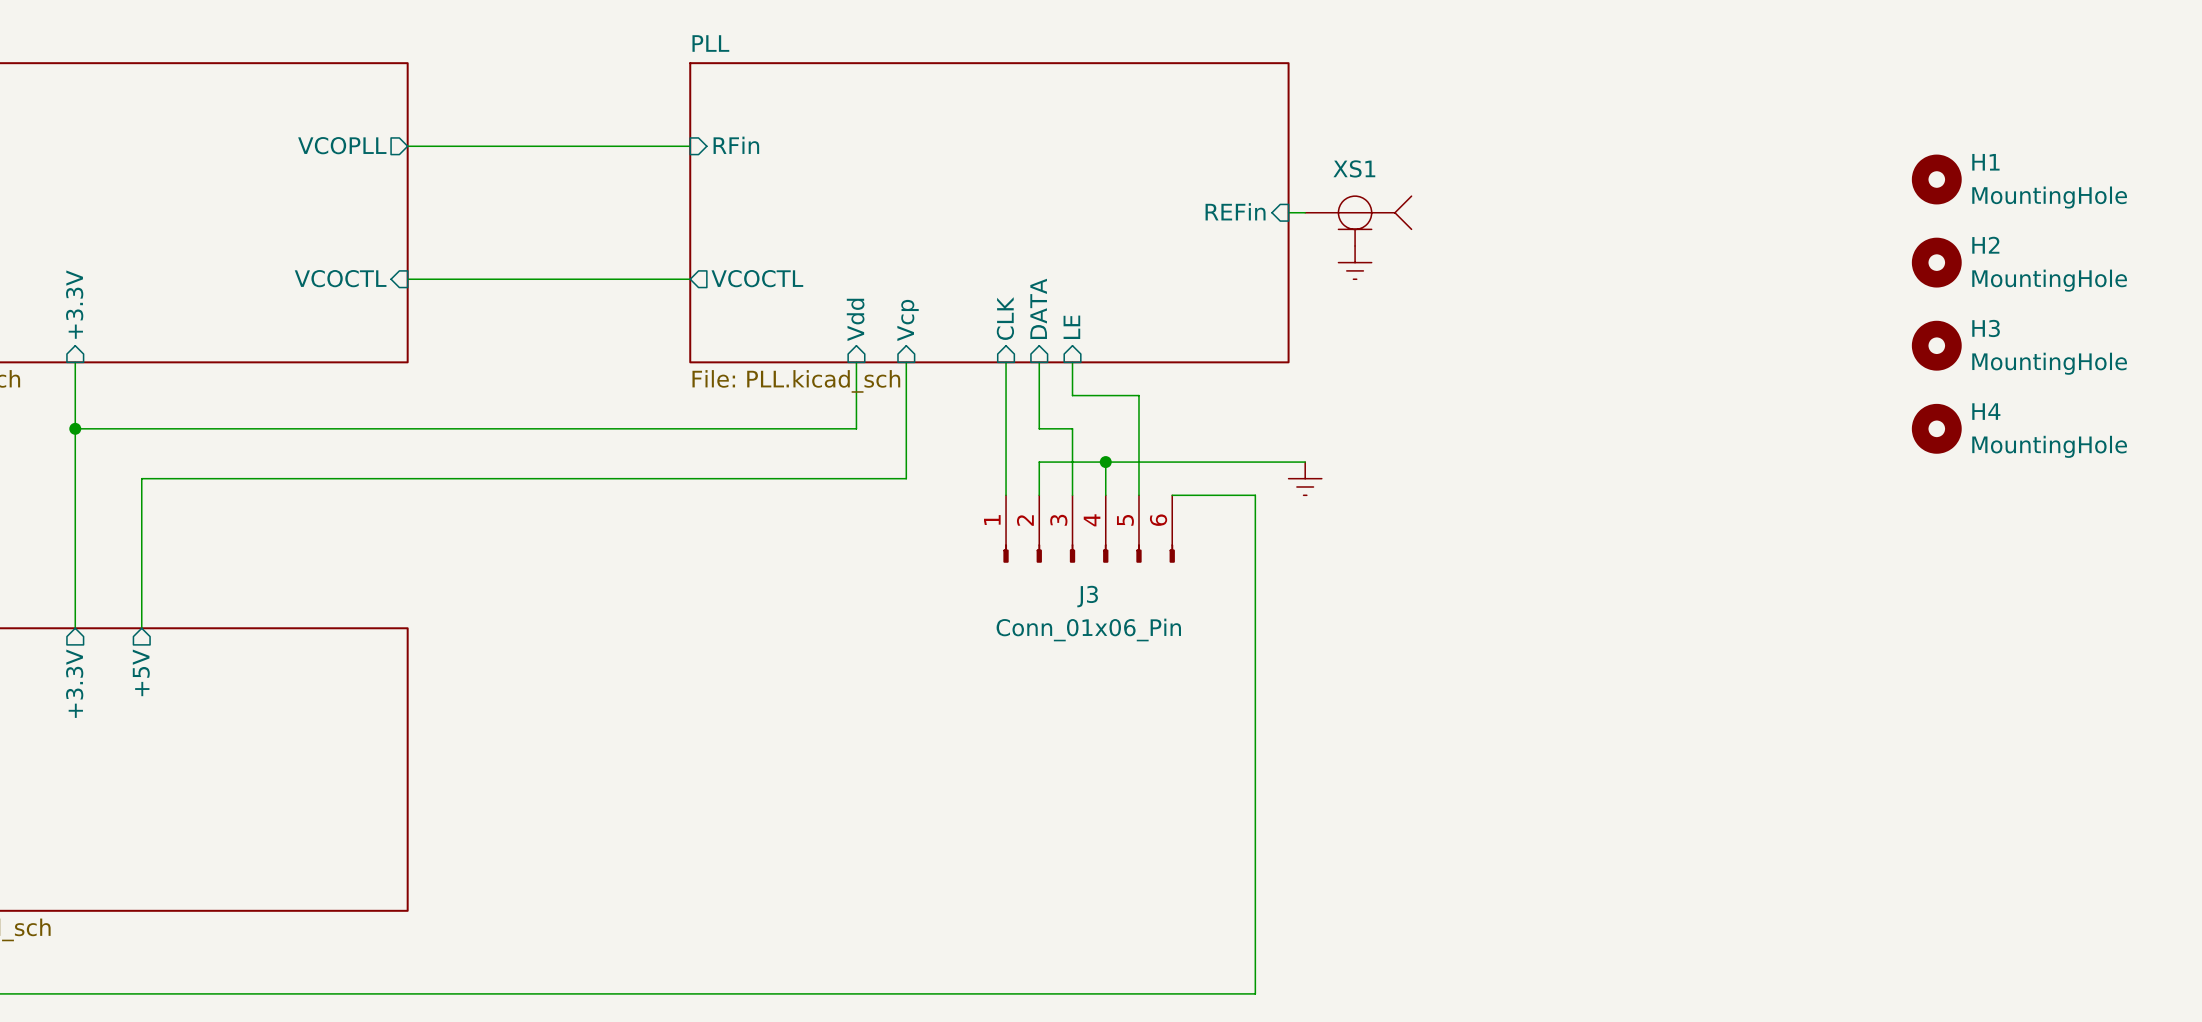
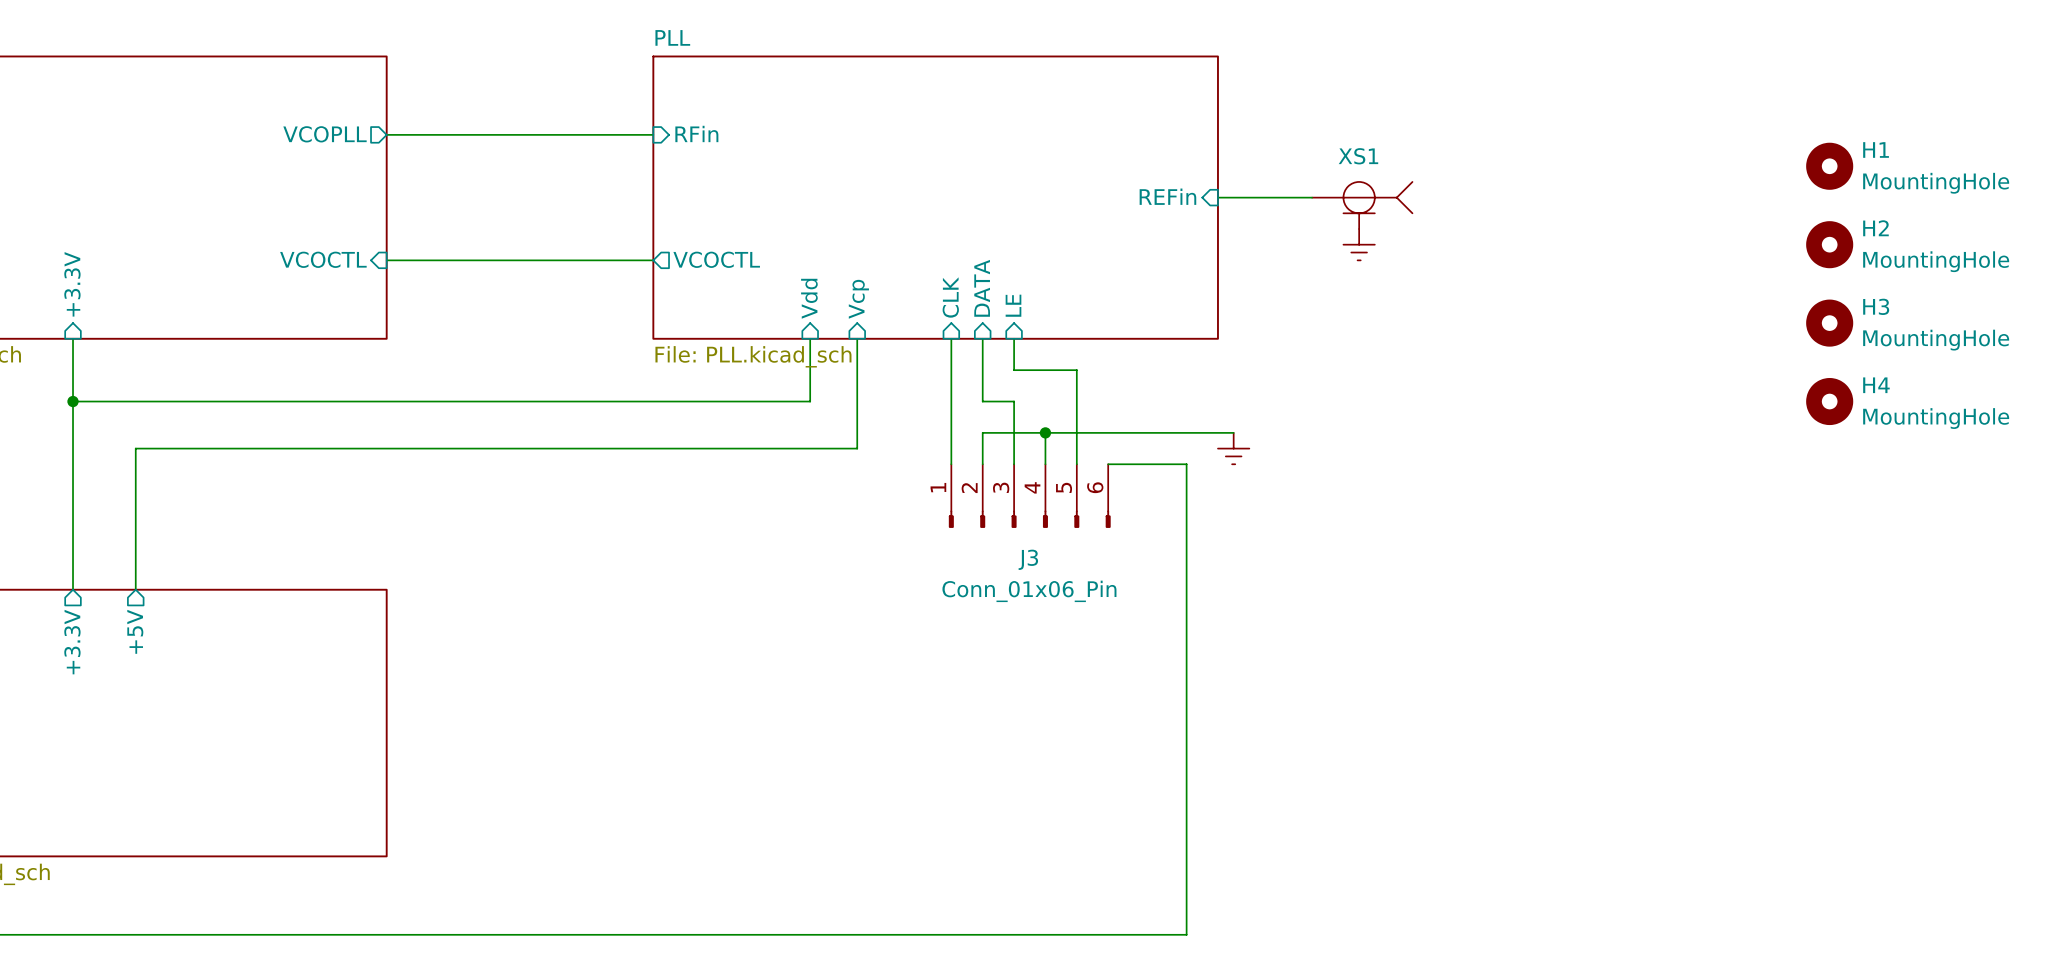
XS1 position: (1396, 179) -> (1398, 166)
power symbol position: (1355, 262) -> (1359, 244)

